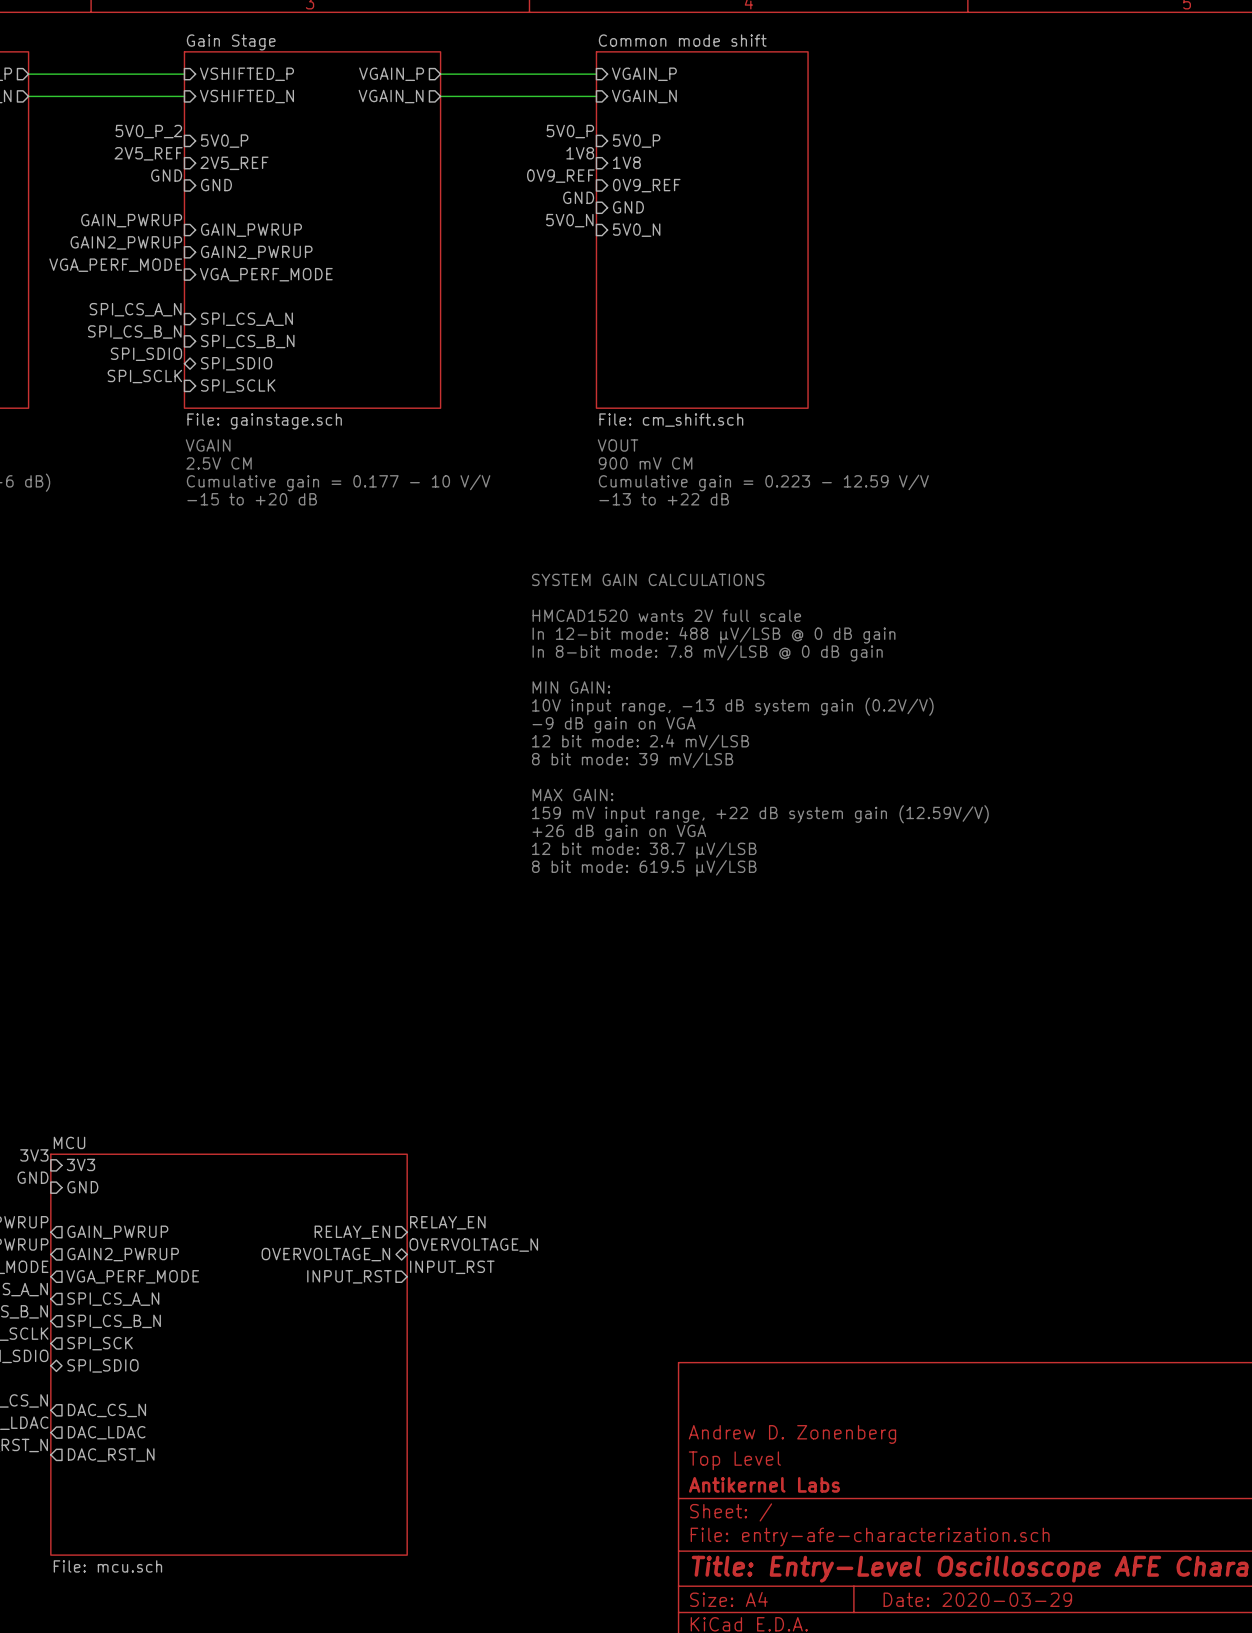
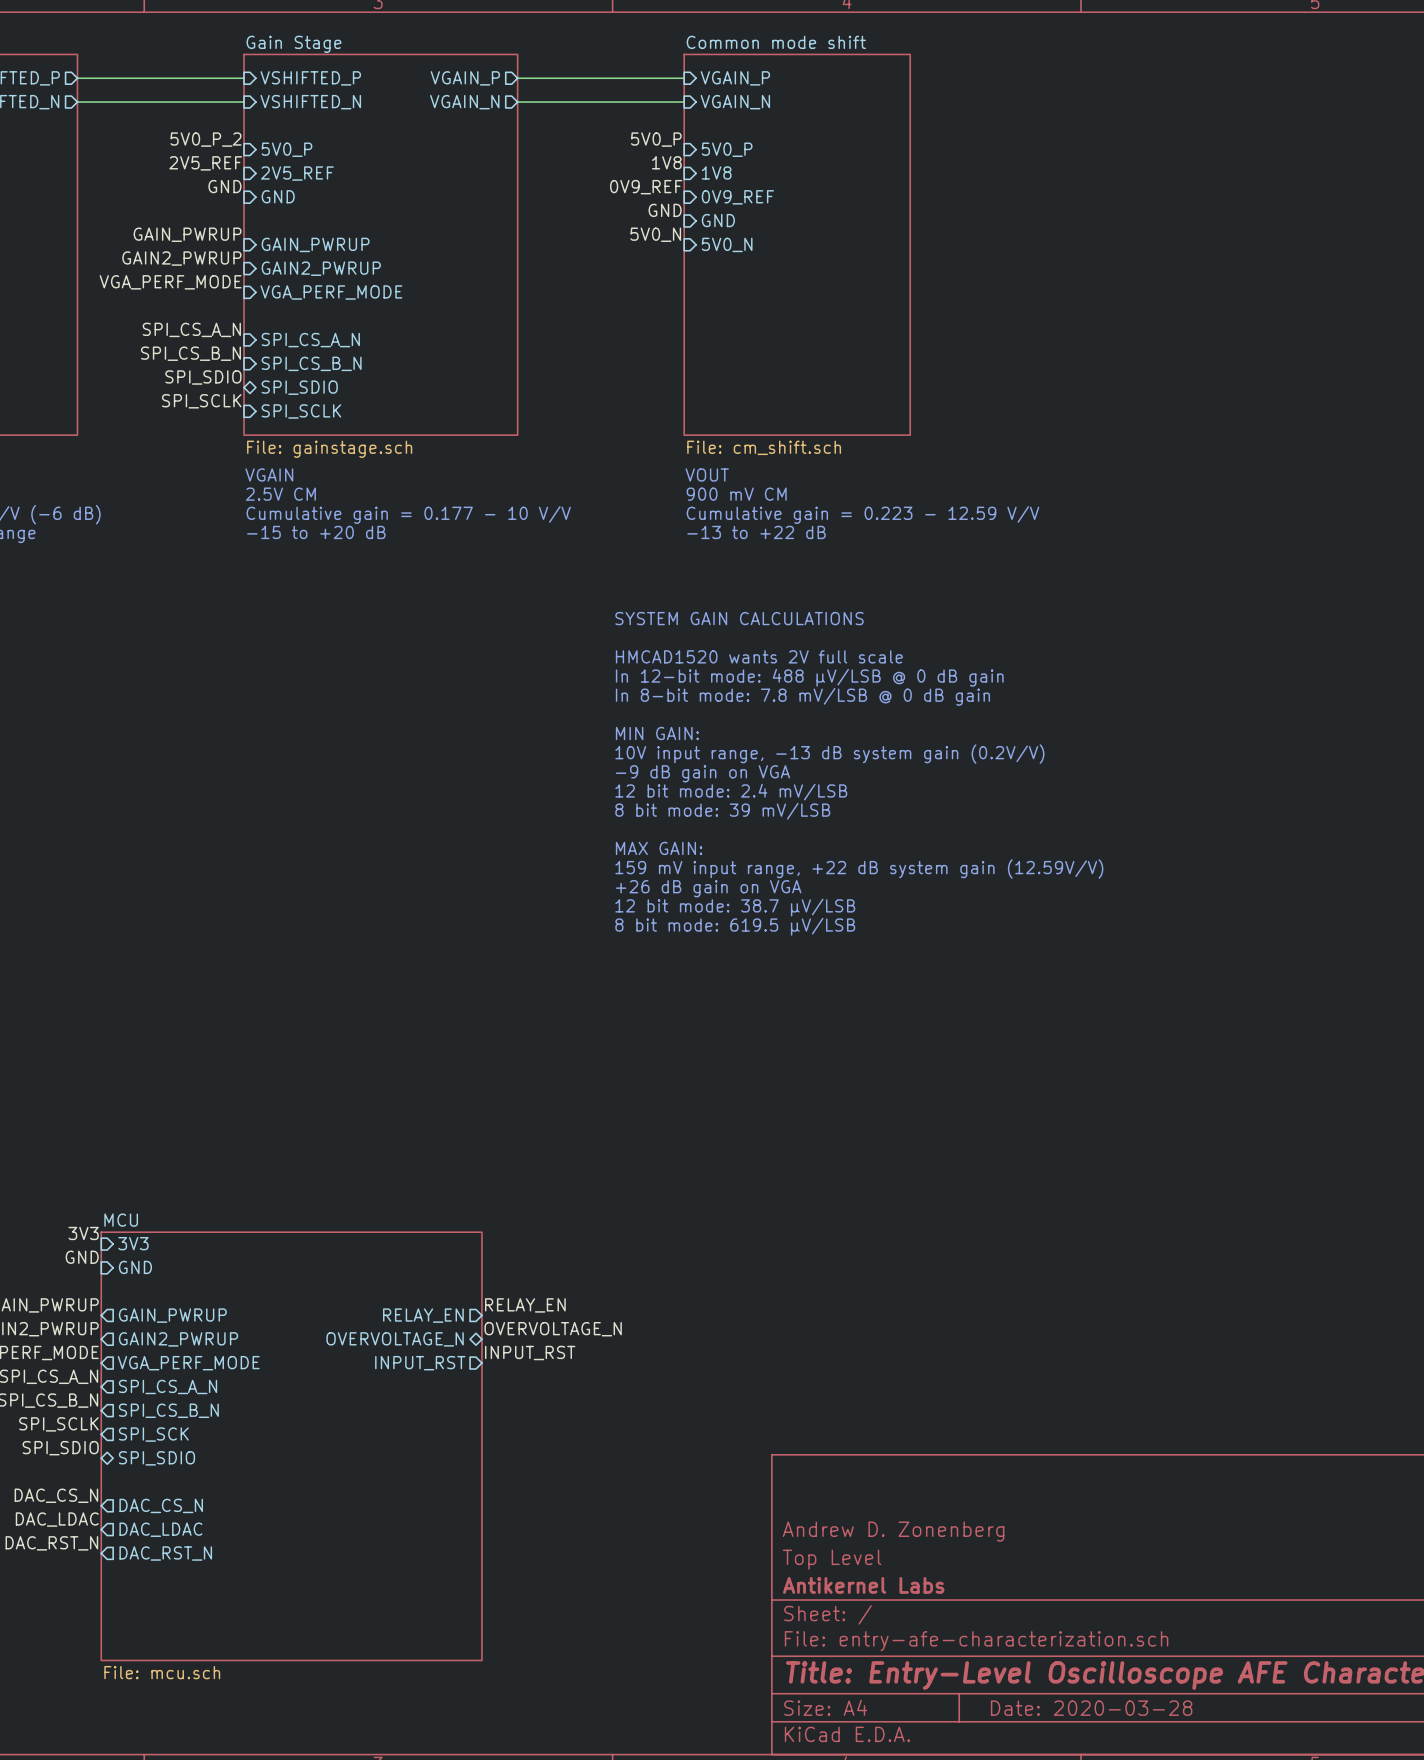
title block: Date: 2020-03-29 (977, 1599) -> Date: 2020-03-28 (1091, 1708)

